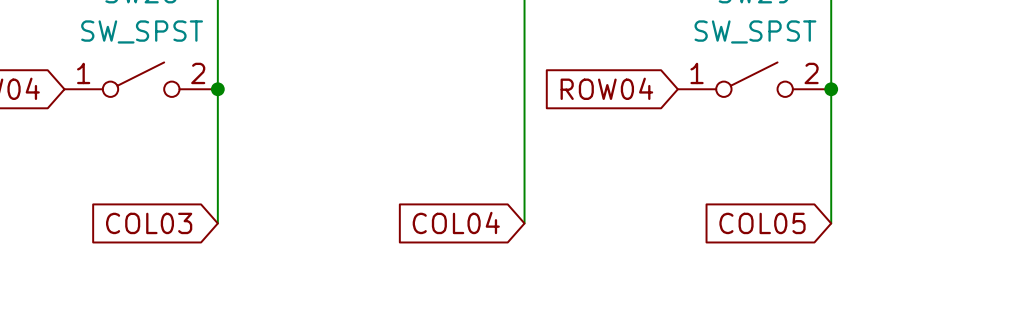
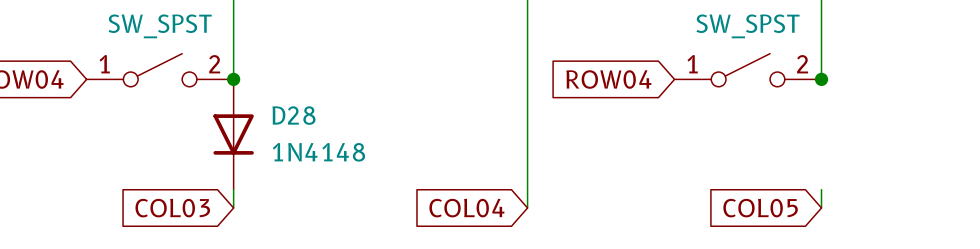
wire: (831, 89) (831, 204) -> none
D28: none -> 1N4148 (233, 134)

